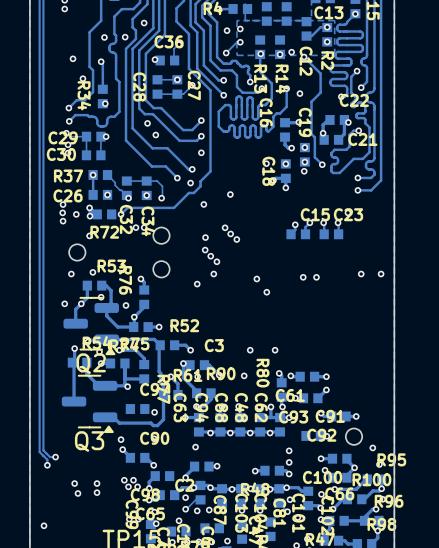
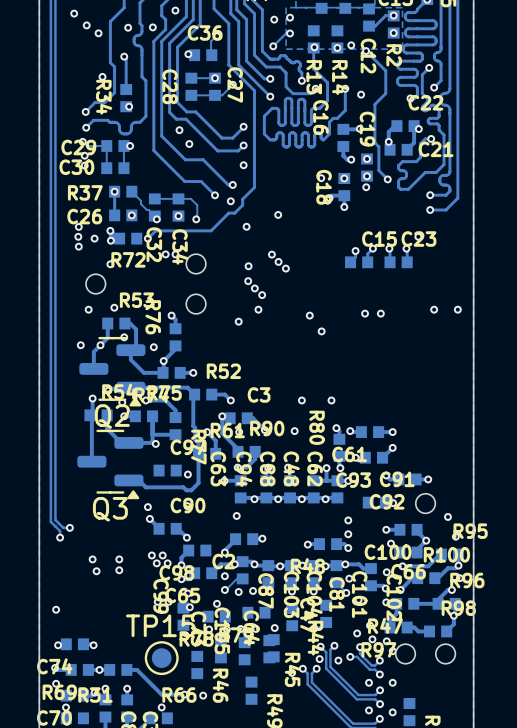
via: none -> (74, 13)
via: none -> (86, 25)
via: none -> (98, 33)
via: (73, 58) -> none

